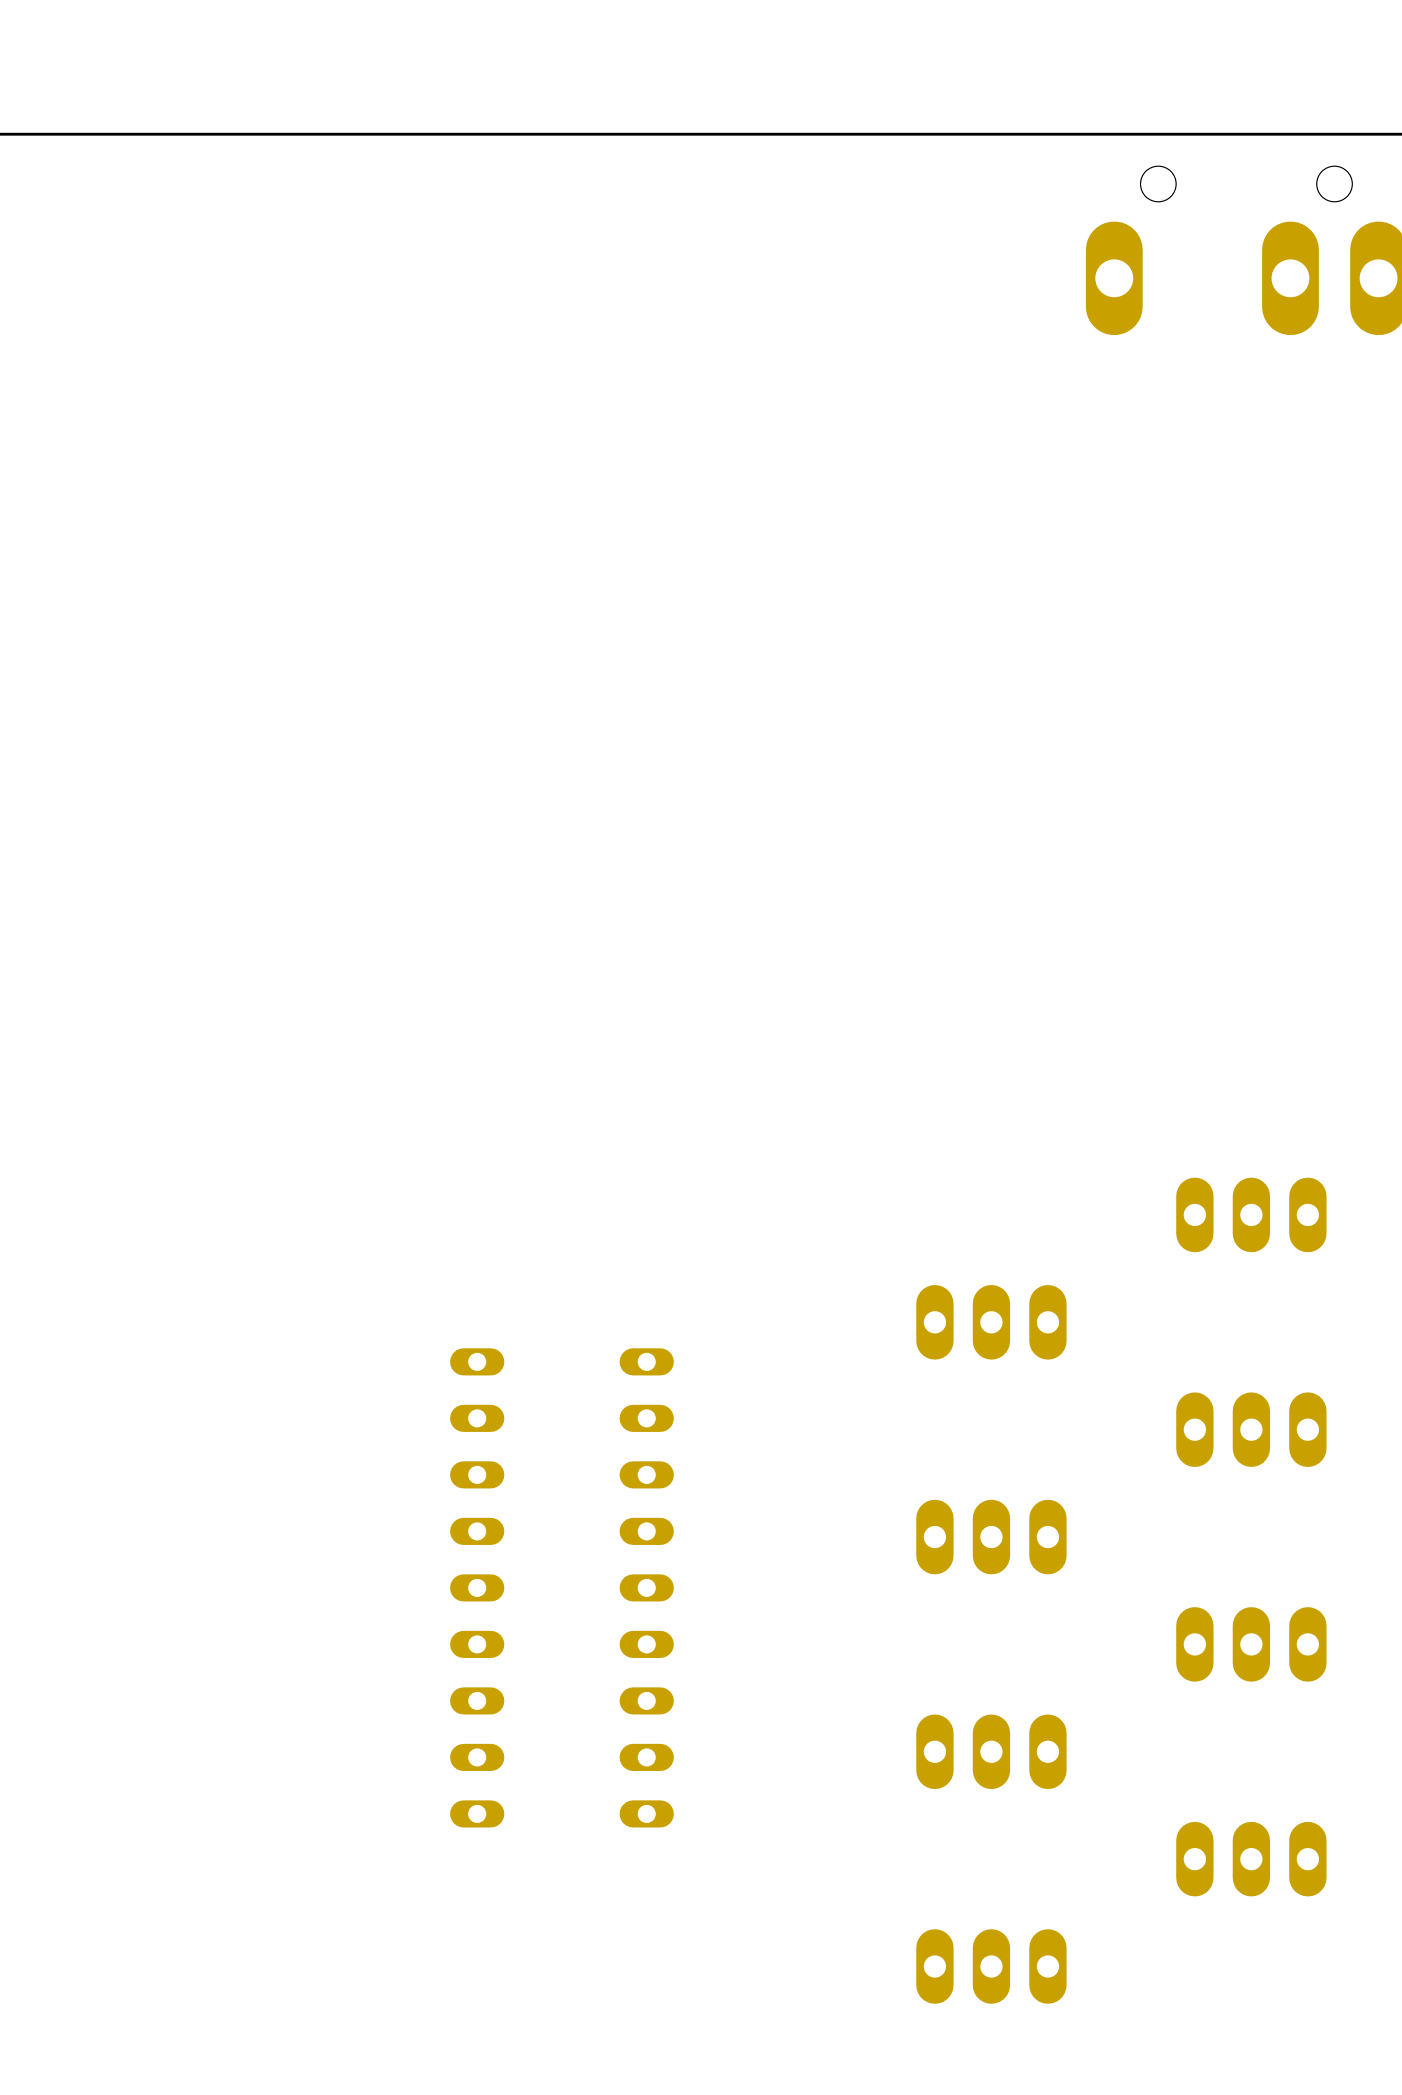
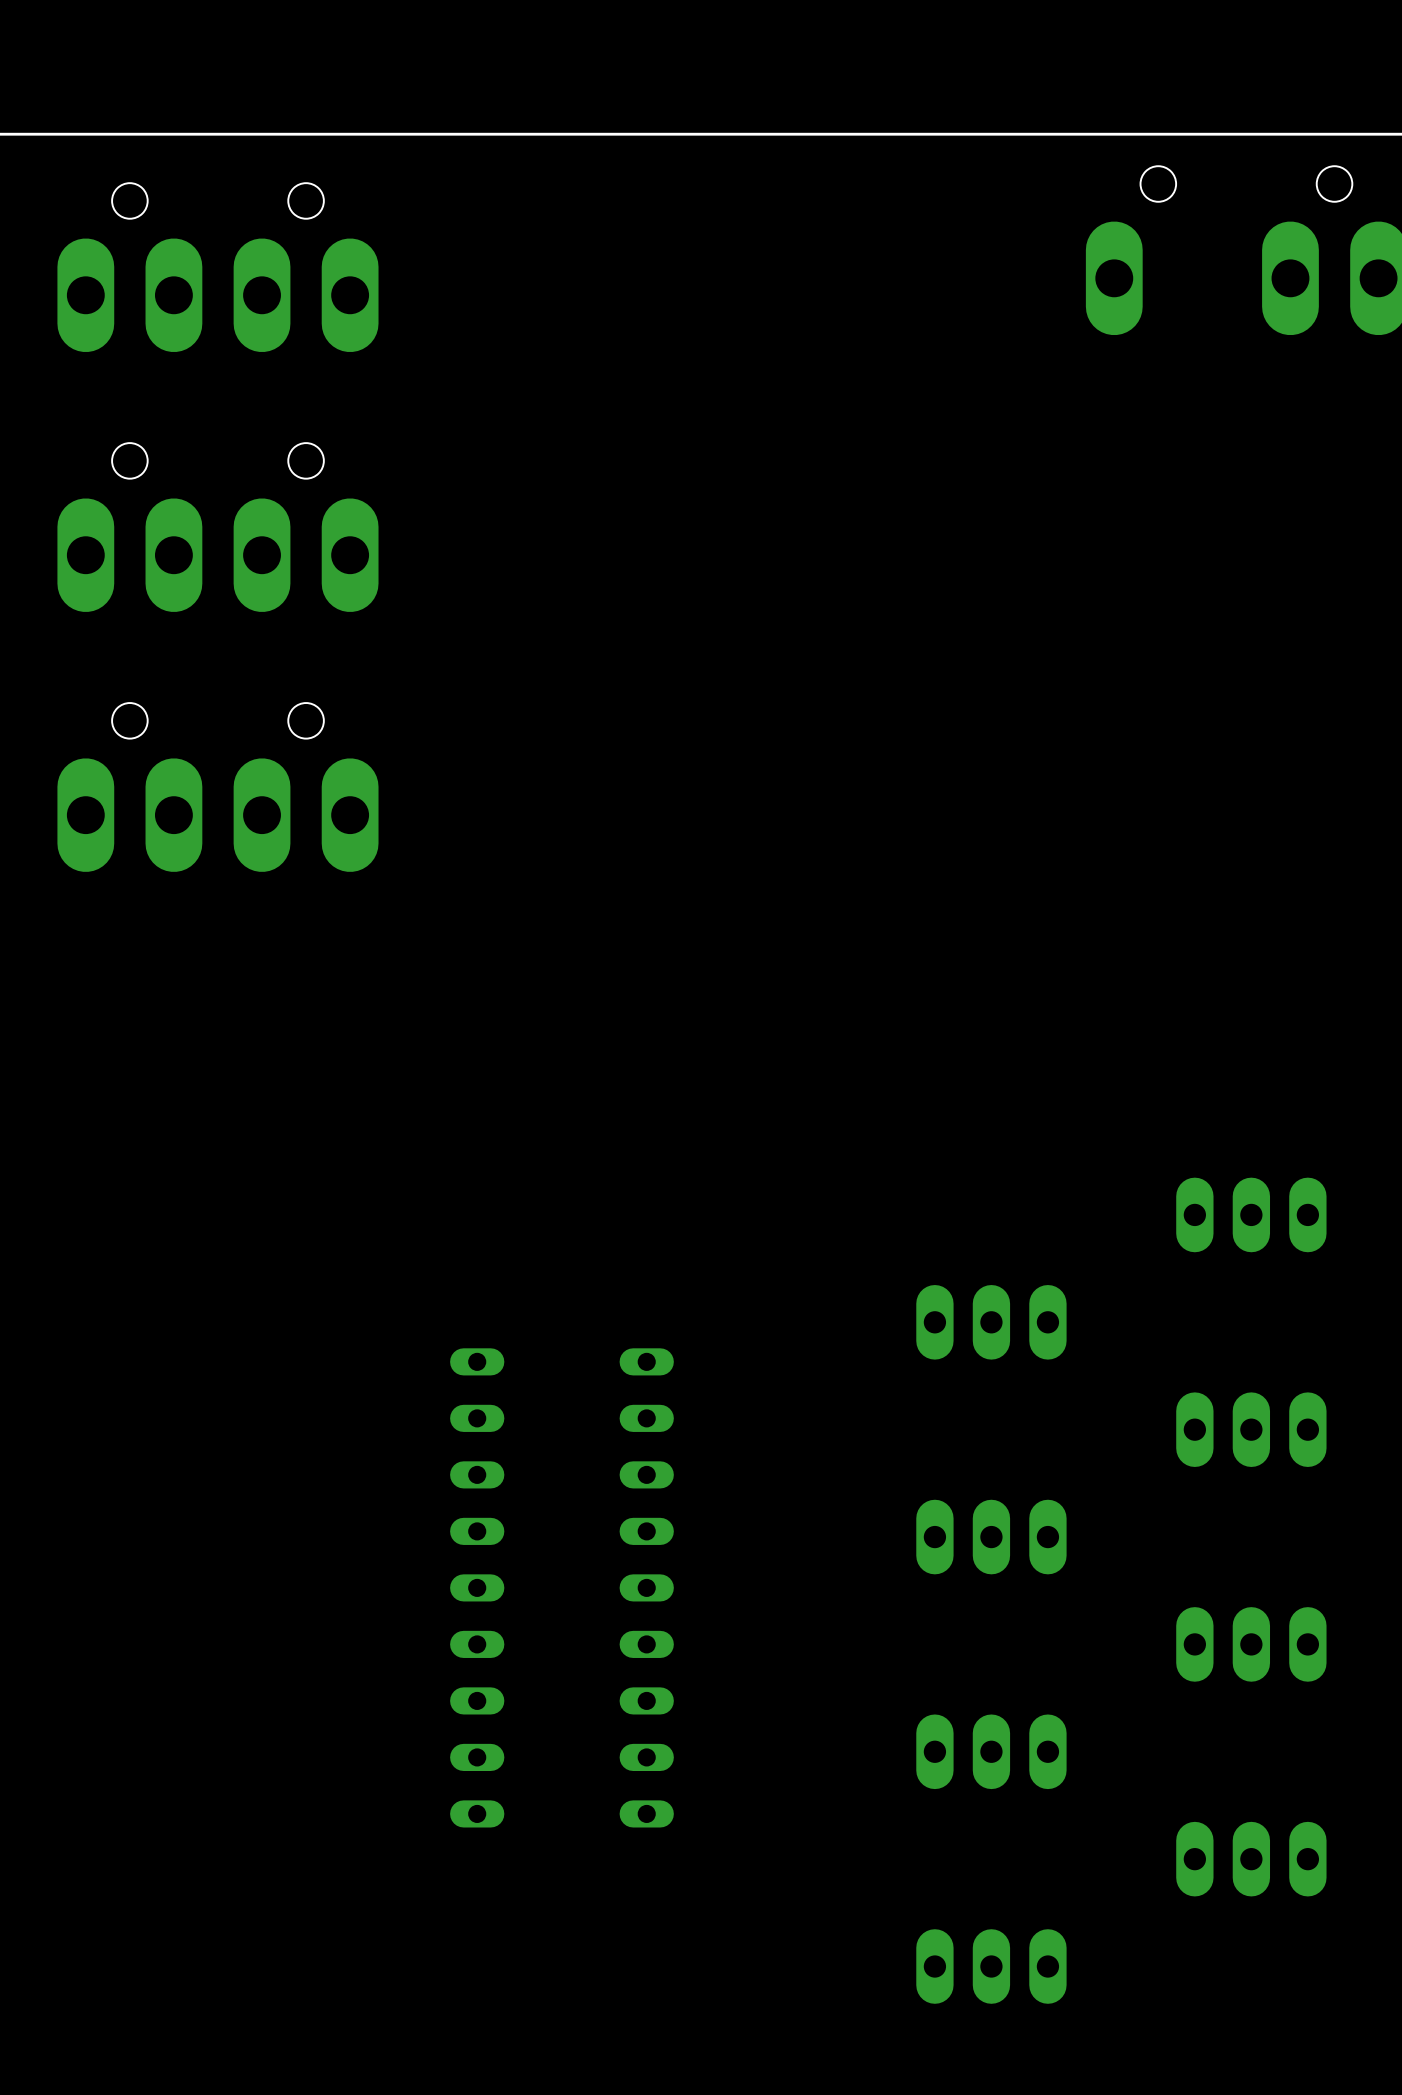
part: none -> (217, 267)
part: none -> (217, 527)
part: none -> (217, 787)

